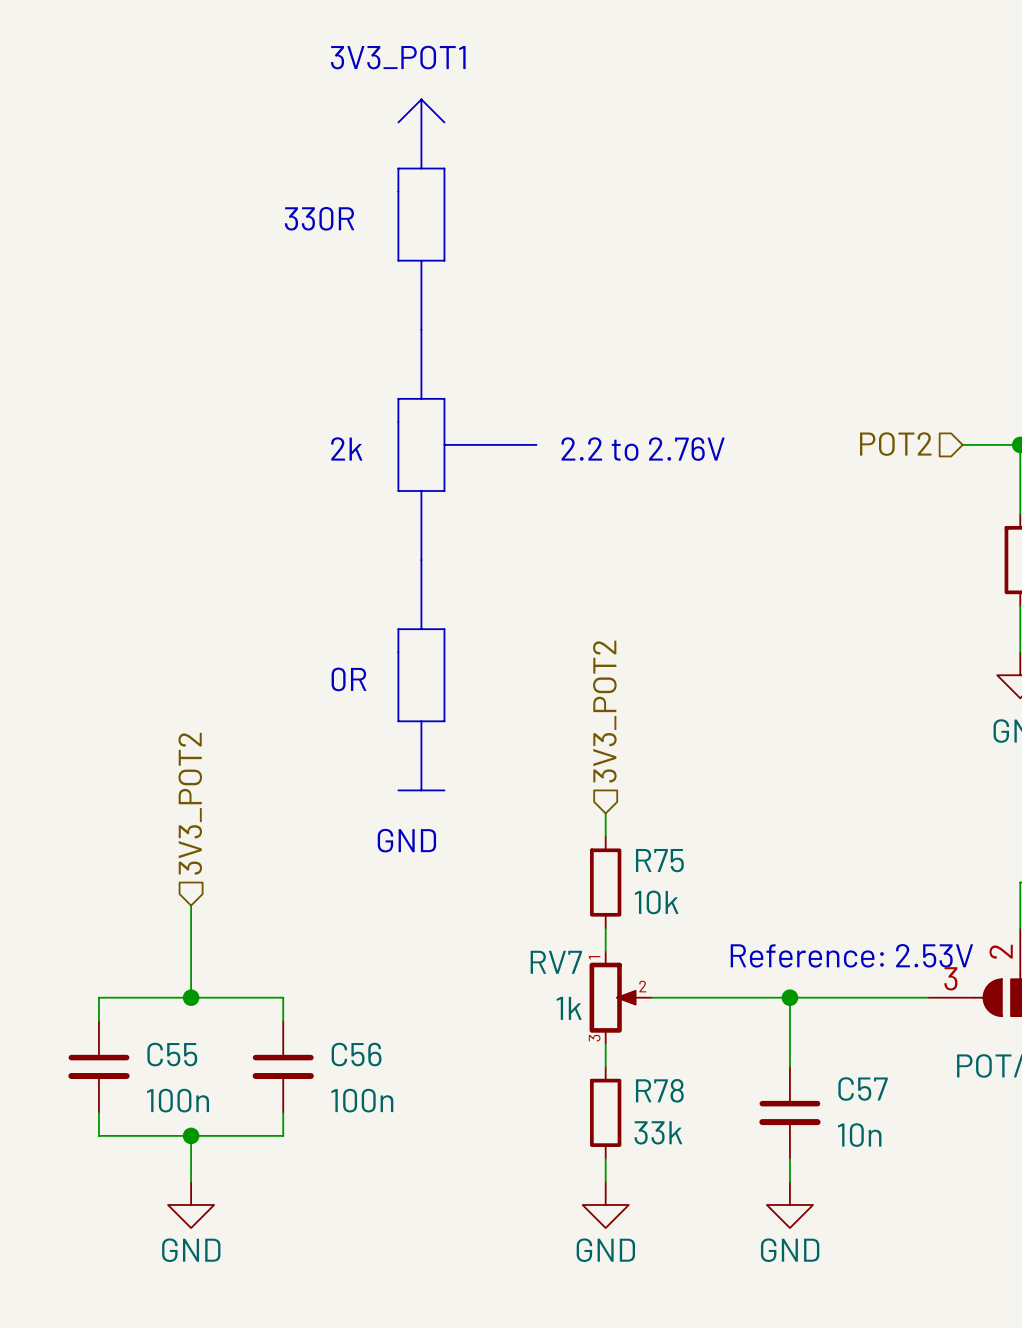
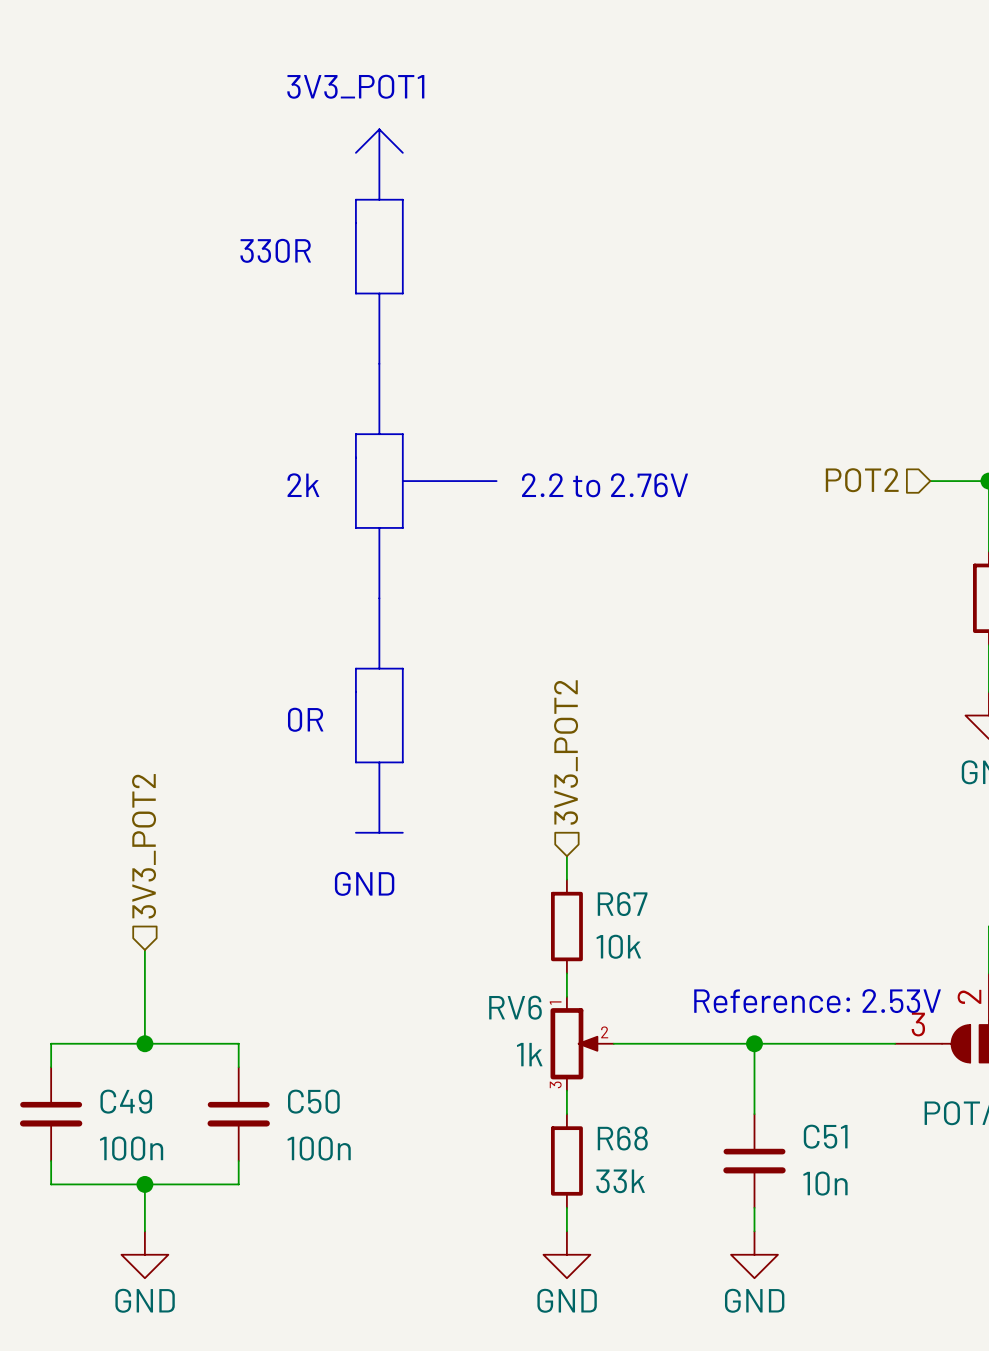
R75 name: R75 (659, 860) -> R67 (622, 904)
RV7 name: RV7 (556, 962) -> RV6 (515, 1007)
C55 name: C55 (172, 1054) -> C49 (126, 1101)
C56 name: C56 (356, 1054) -> C50 (313, 1101)
C57 name: C57 (863, 1088) -> C51 (825, 1136)
R78 name: R78 (659, 1090) -> R68 (622, 1138)

